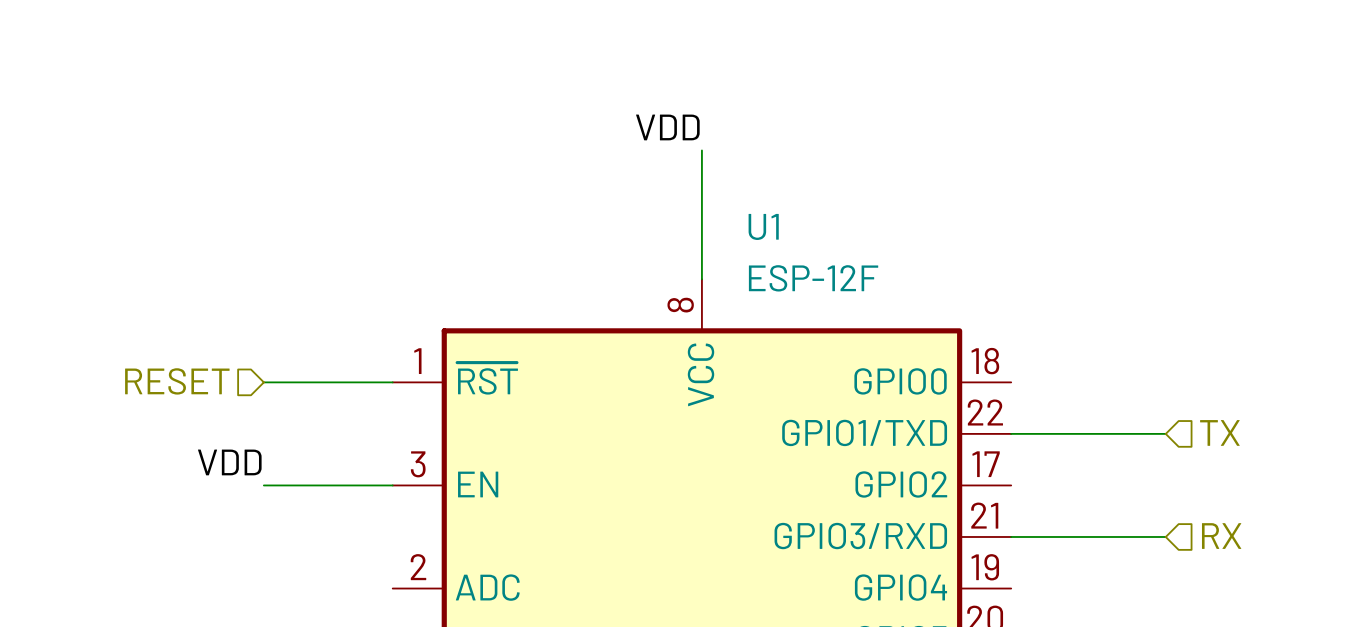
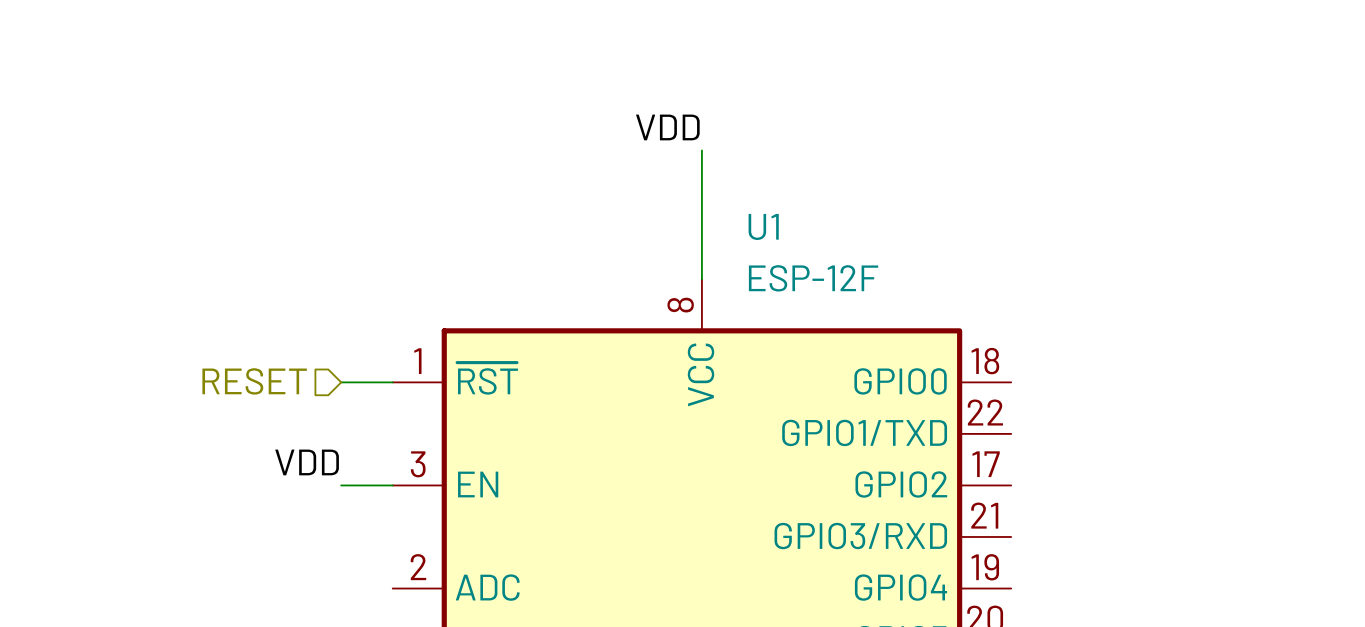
hierarchical label position: RESET (177, 381) -> RESET (254, 381)
wire: (263, 382) (341, 382) -> none
hierarchical label: TX (1219, 432) -> none
wire: (1011, 433) (1165, 433) -> none
label position: VDD (229, 462) -> VDD (307, 462)
wire: (263, 485) (341, 485) -> none
wire: (1011, 536) (1165, 536) -> none
hierarchical label: RX (1221, 536) -> none

